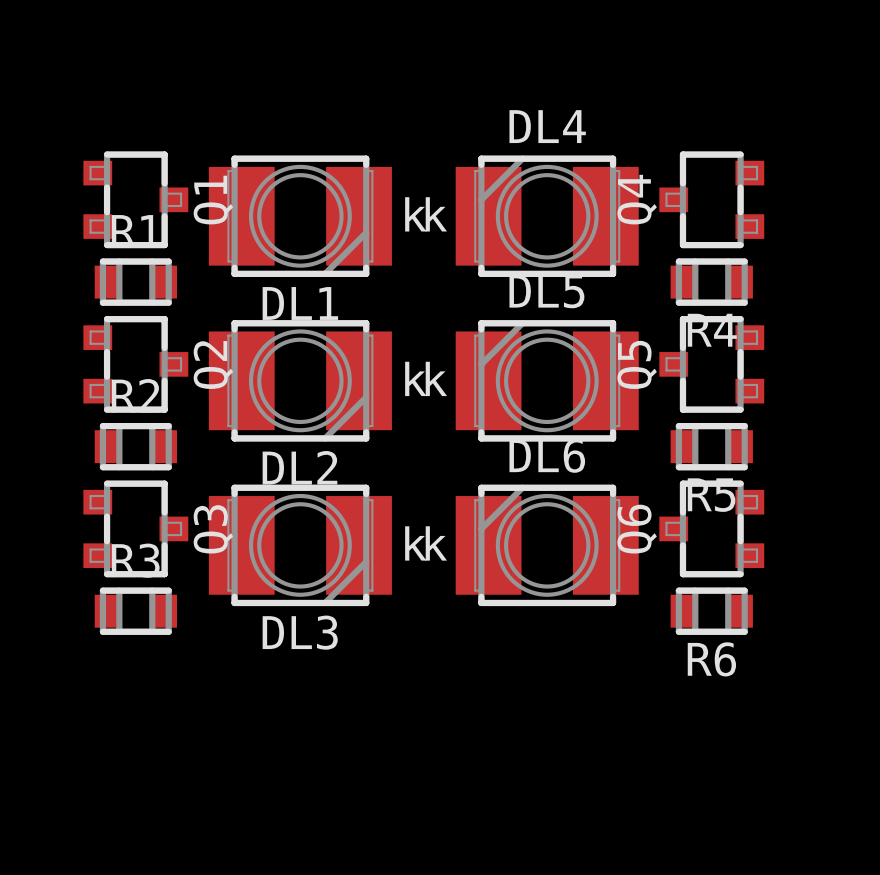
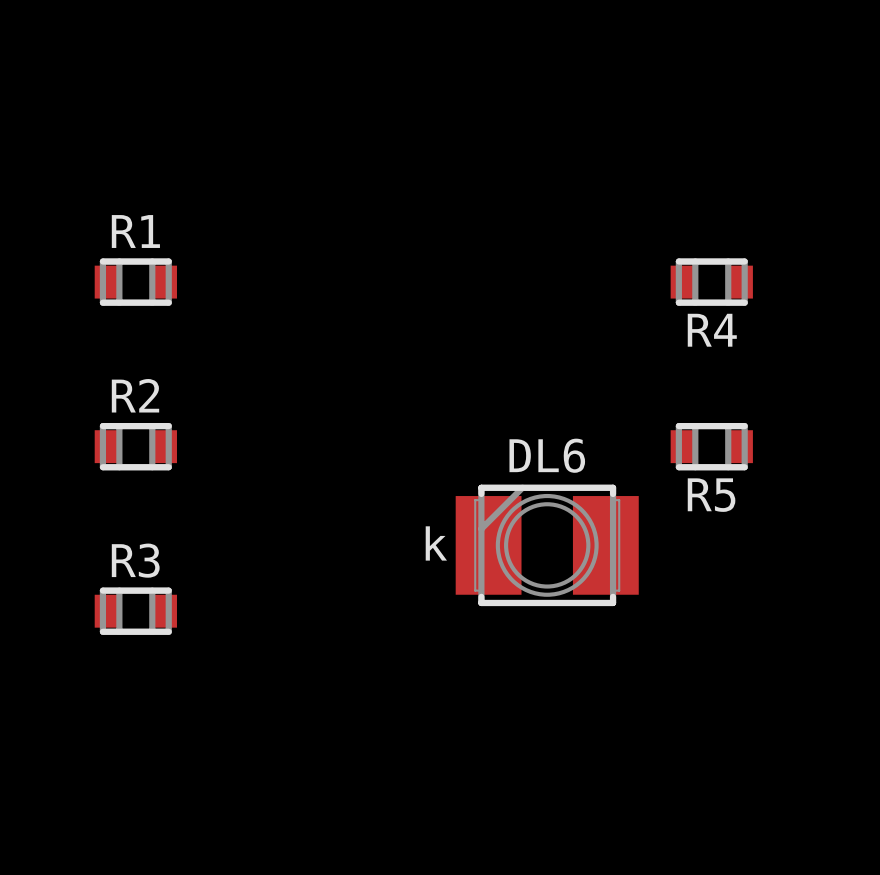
Q1: (135, 199) -> none
Q4: (711, 199) -> none
DL1: (300, 216) -> none
DL4: (547, 216) -> none
Q2: (135, 364) -> none
Q5: (711, 364) -> none
DL2: (300, 380) -> none
DL5: (547, 380) -> none
Q3: (135, 528) -> none
Q6: (711, 528) -> none
DL3: (300, 545) -> none
R6: (711, 611) -> none

